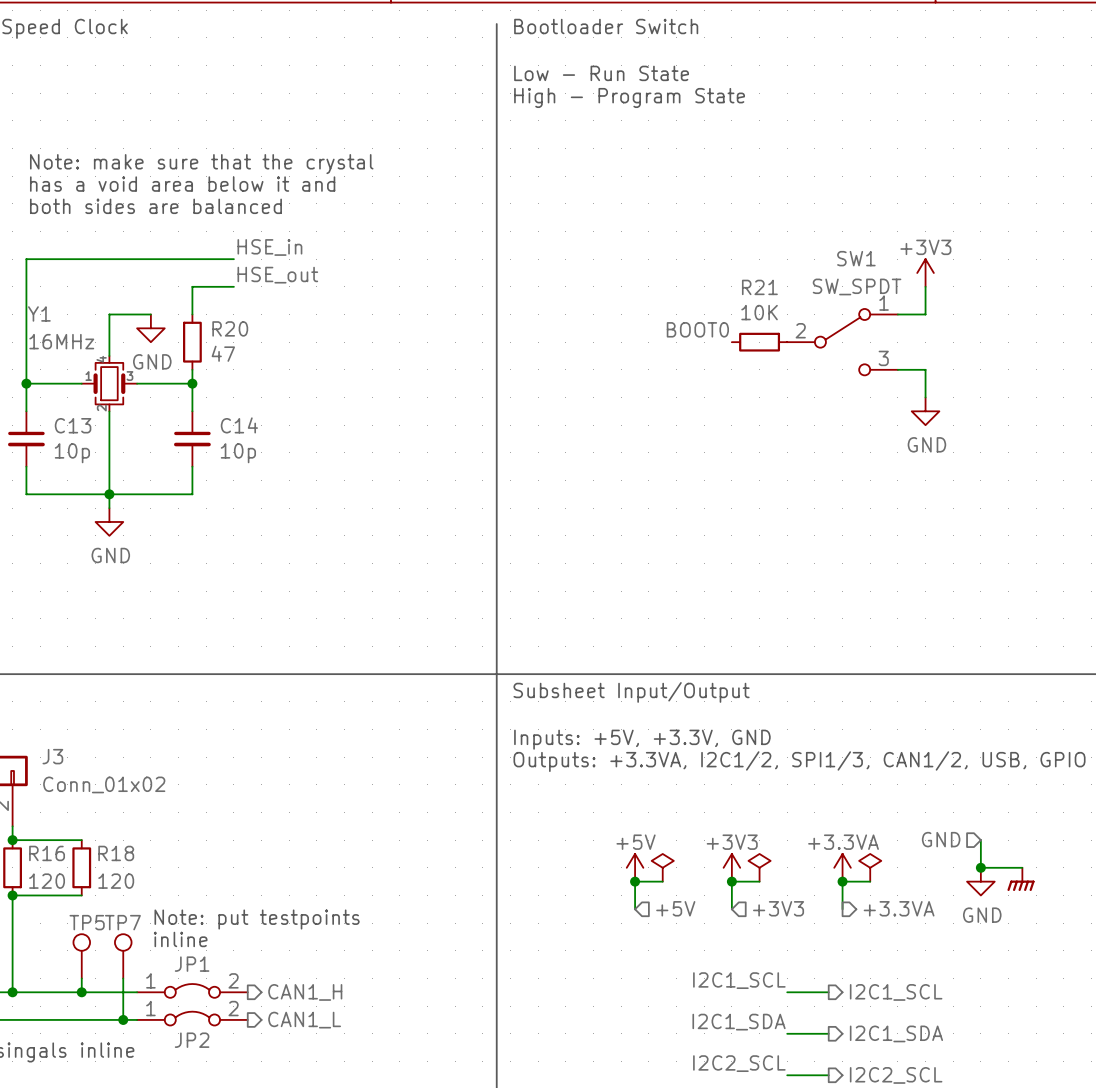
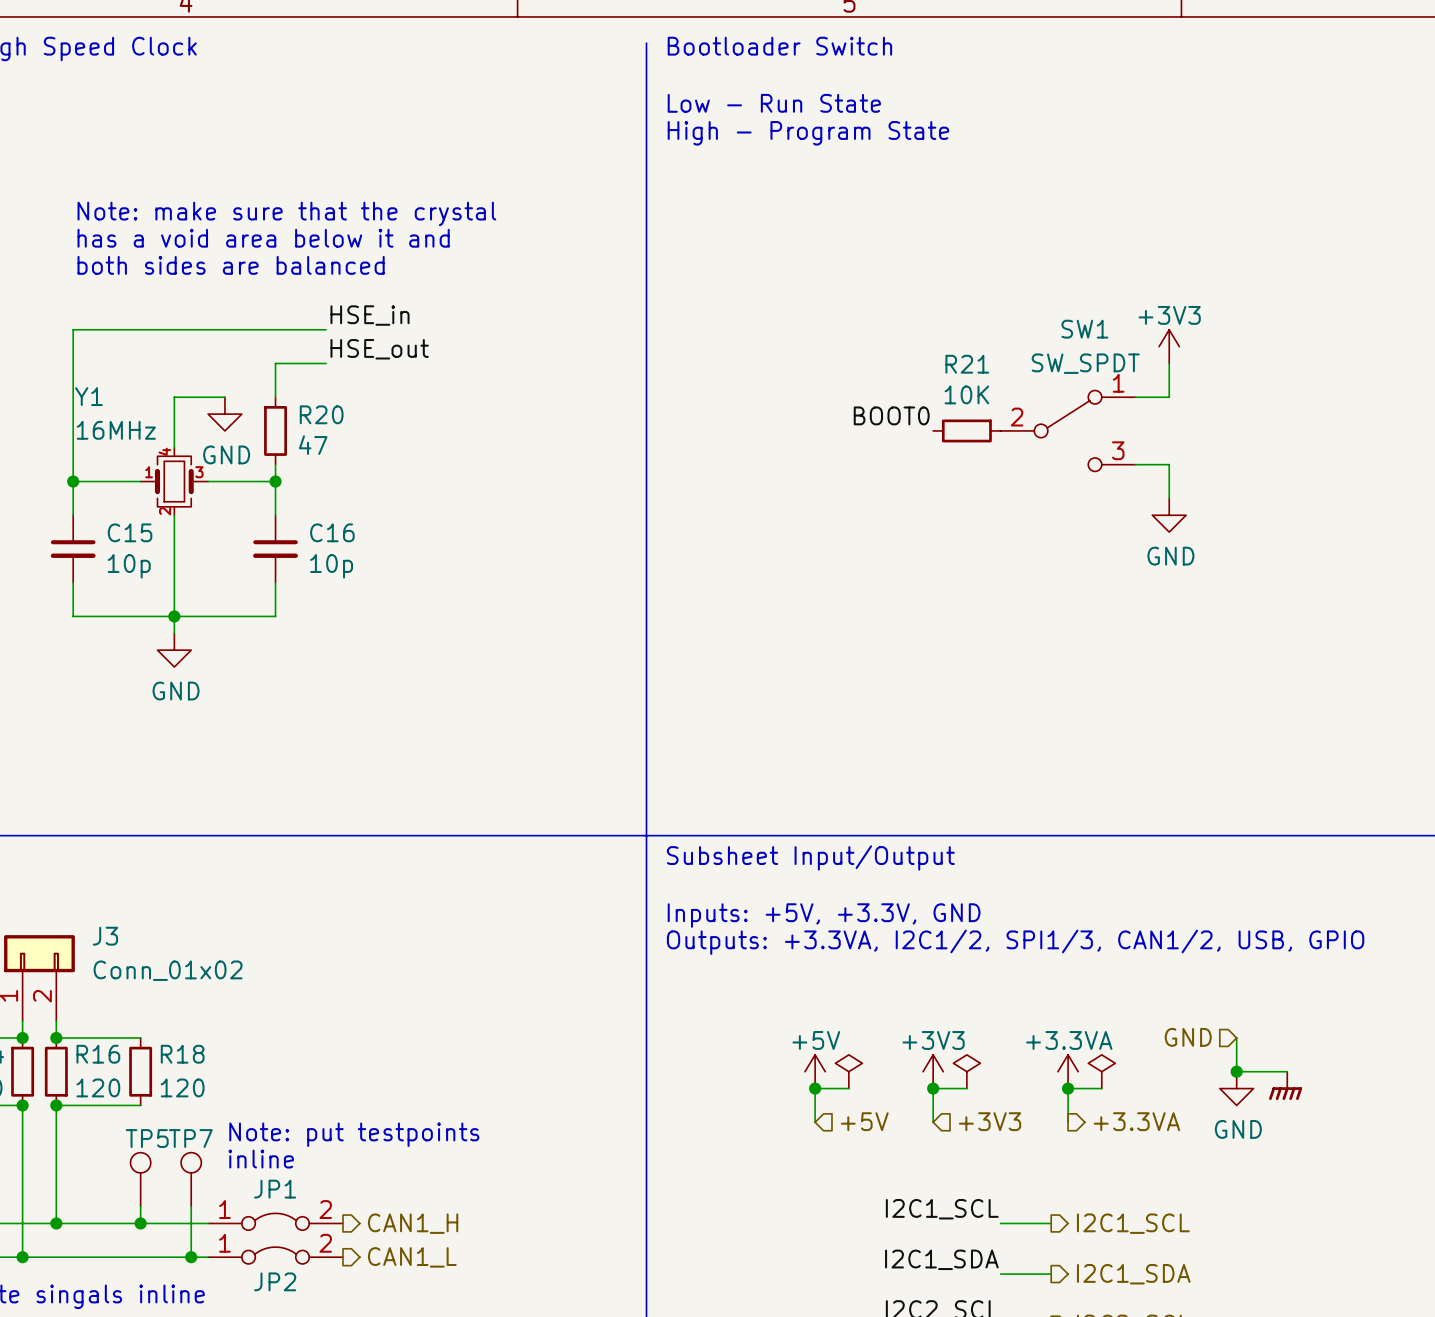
C13 name: C13 (73, 425) -> C15 (130, 532)
C14 name: C14 (239, 425) -> C16 (332, 532)

